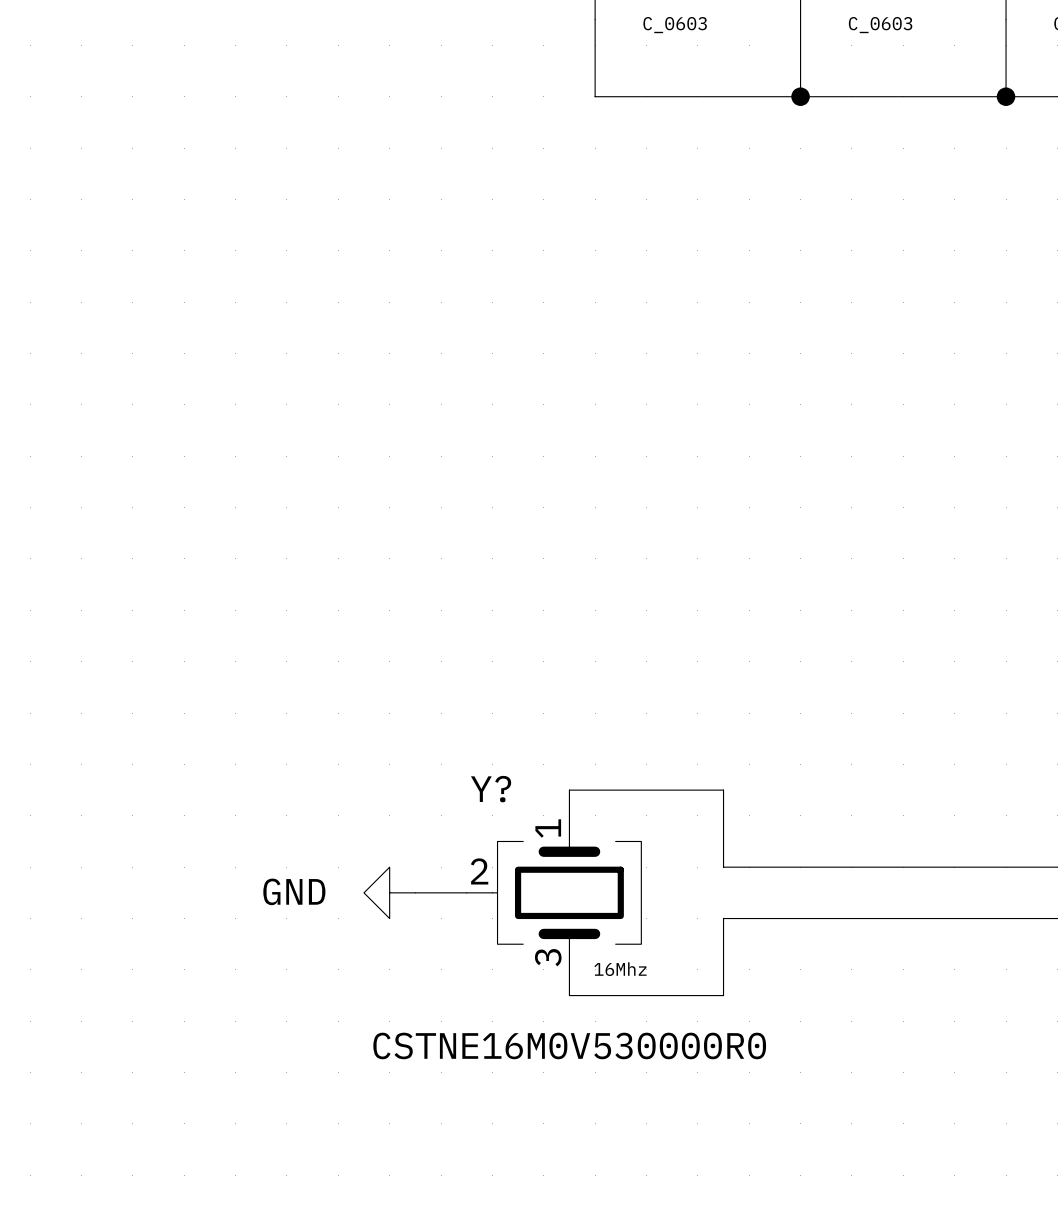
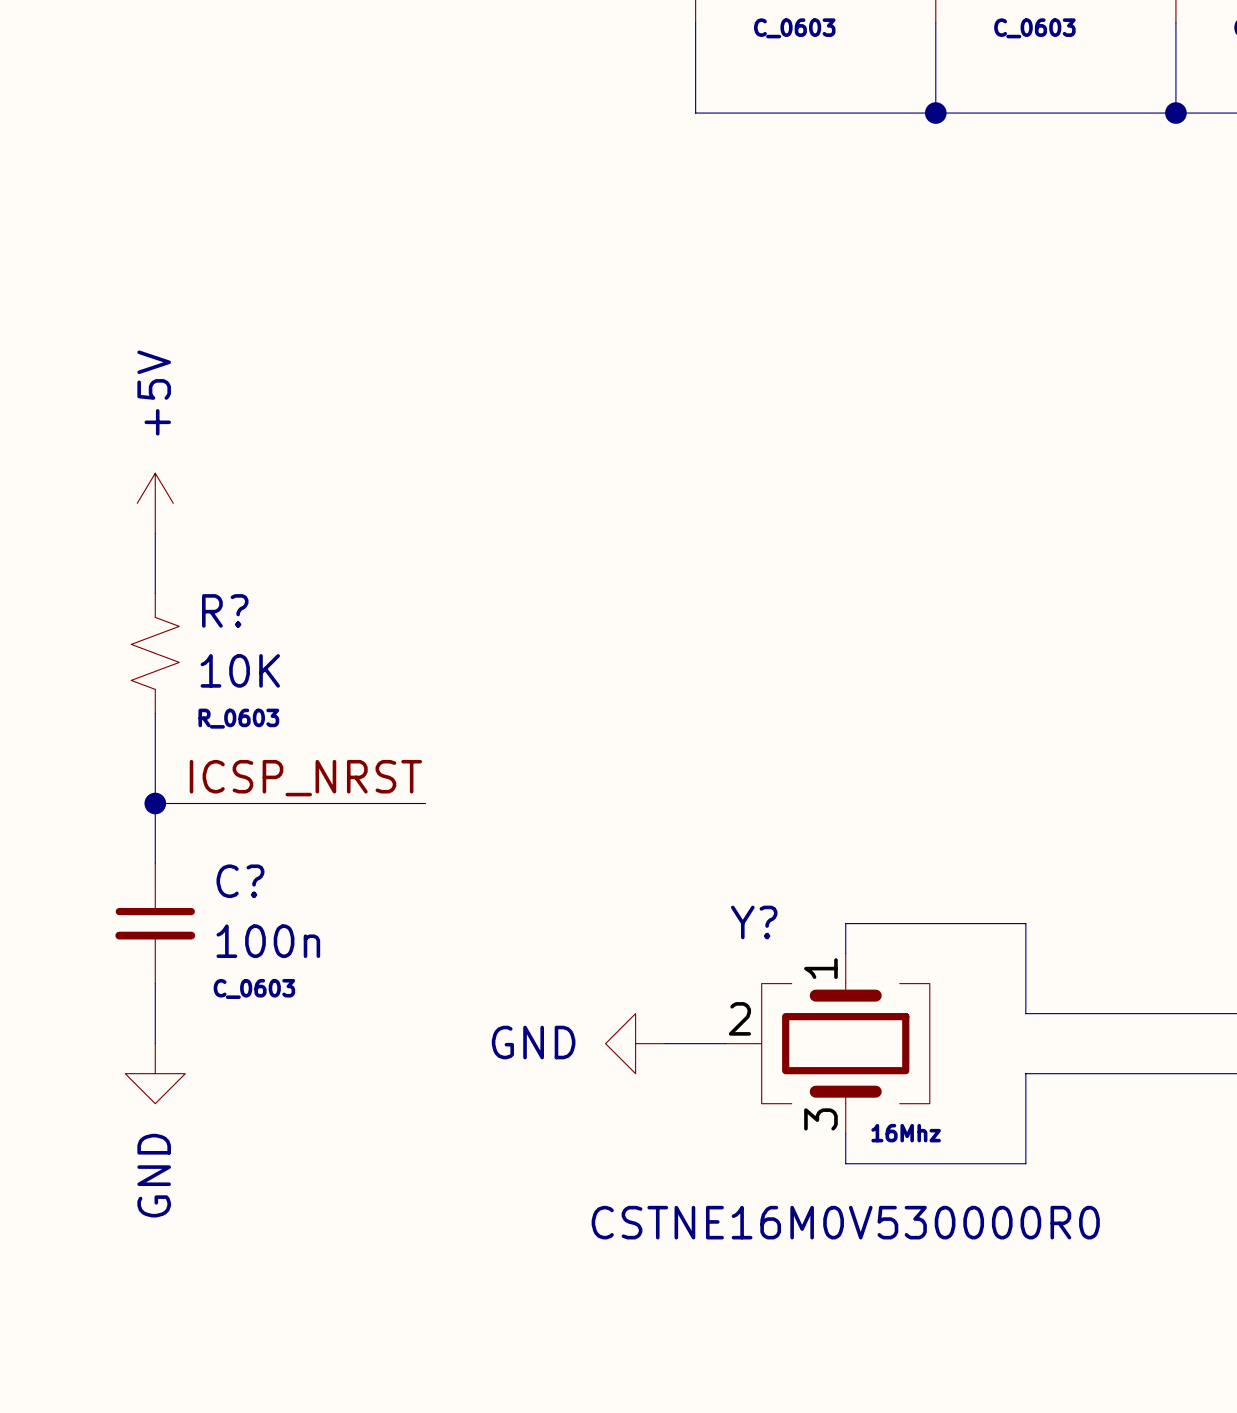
power symbol: none -> +5V (155, 503)
wire: none -> (155, 533) (155, 593)
R?: none -> 10K (155, 653)
wire: none -> (155, 713) (155, 863)
label: none -> ICSP_NRST (305, 778)
wire: none -> (155, 803) (425, 803)
junction: none -> (155, 803)
C?: none -> 100n (155, 923)
wire: (723, 790) (569, 790) (569, 815) -> none
wire: (723, 815) (723, 867) (877, 867) -> (845, 923) (1025, 923) (1025, 1013)
wire: none -> (155, 983) (155, 1043)
power symbol: GND (389, 892) -> none
wire: (415, 892) (466, 892) -> (665, 1043) (725, 1043)
power symbol: none -> GND (635, 1043)
Y? position: (554, 892) -> (827, 1043)
power symbol: none -> GND (155, 1073)
wire: (877, 918) (723, 918) (723, 969) -> (1025, 1073) (1025, 1163) (845, 1163)
wire: (569, 969) (569, 995) (723, 995) -> none

